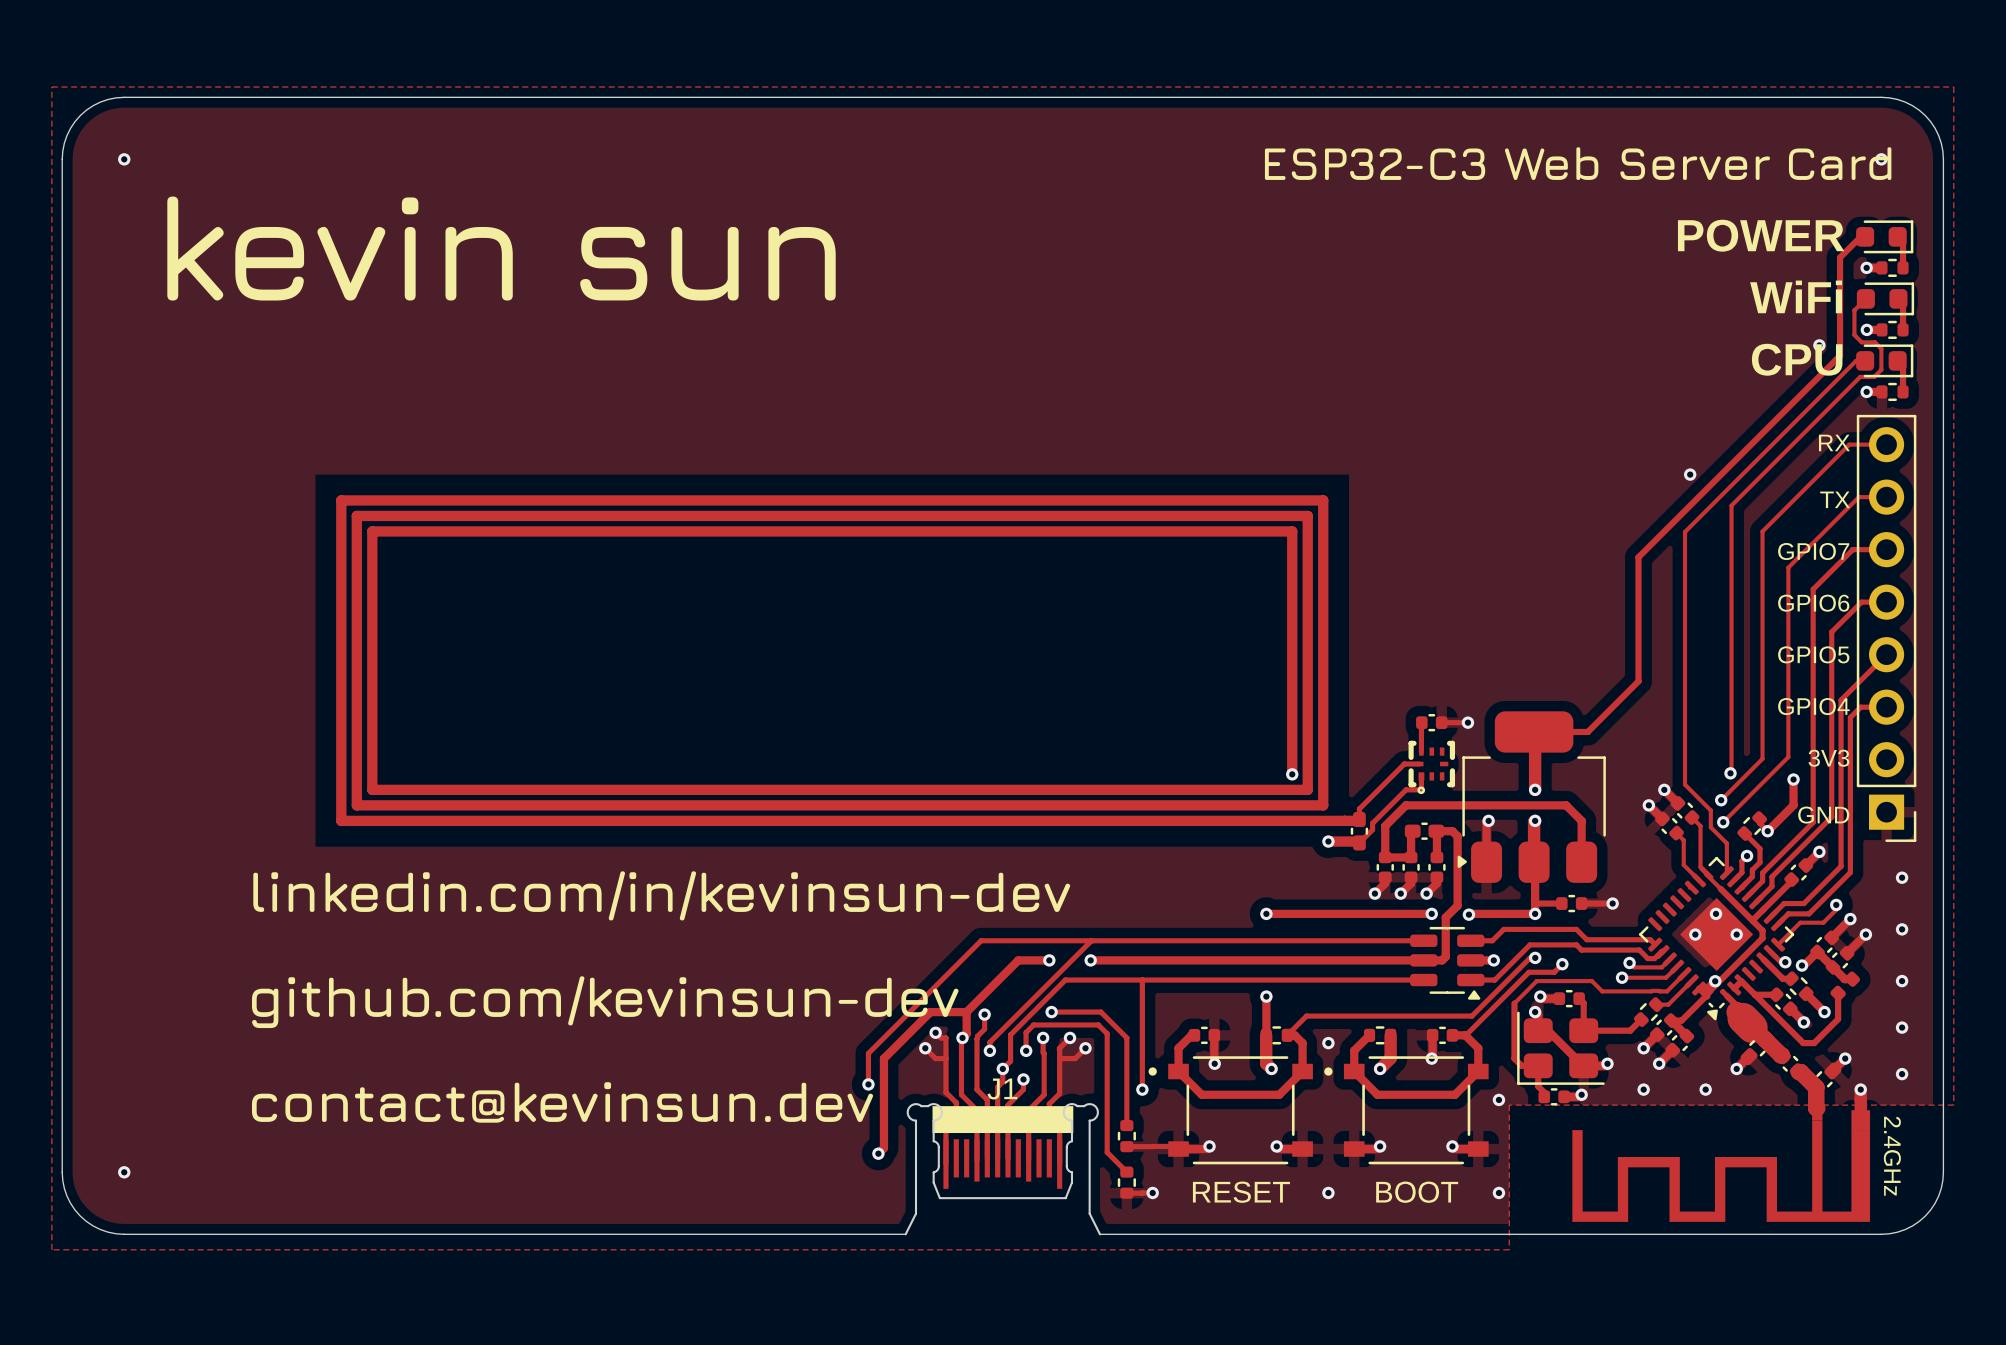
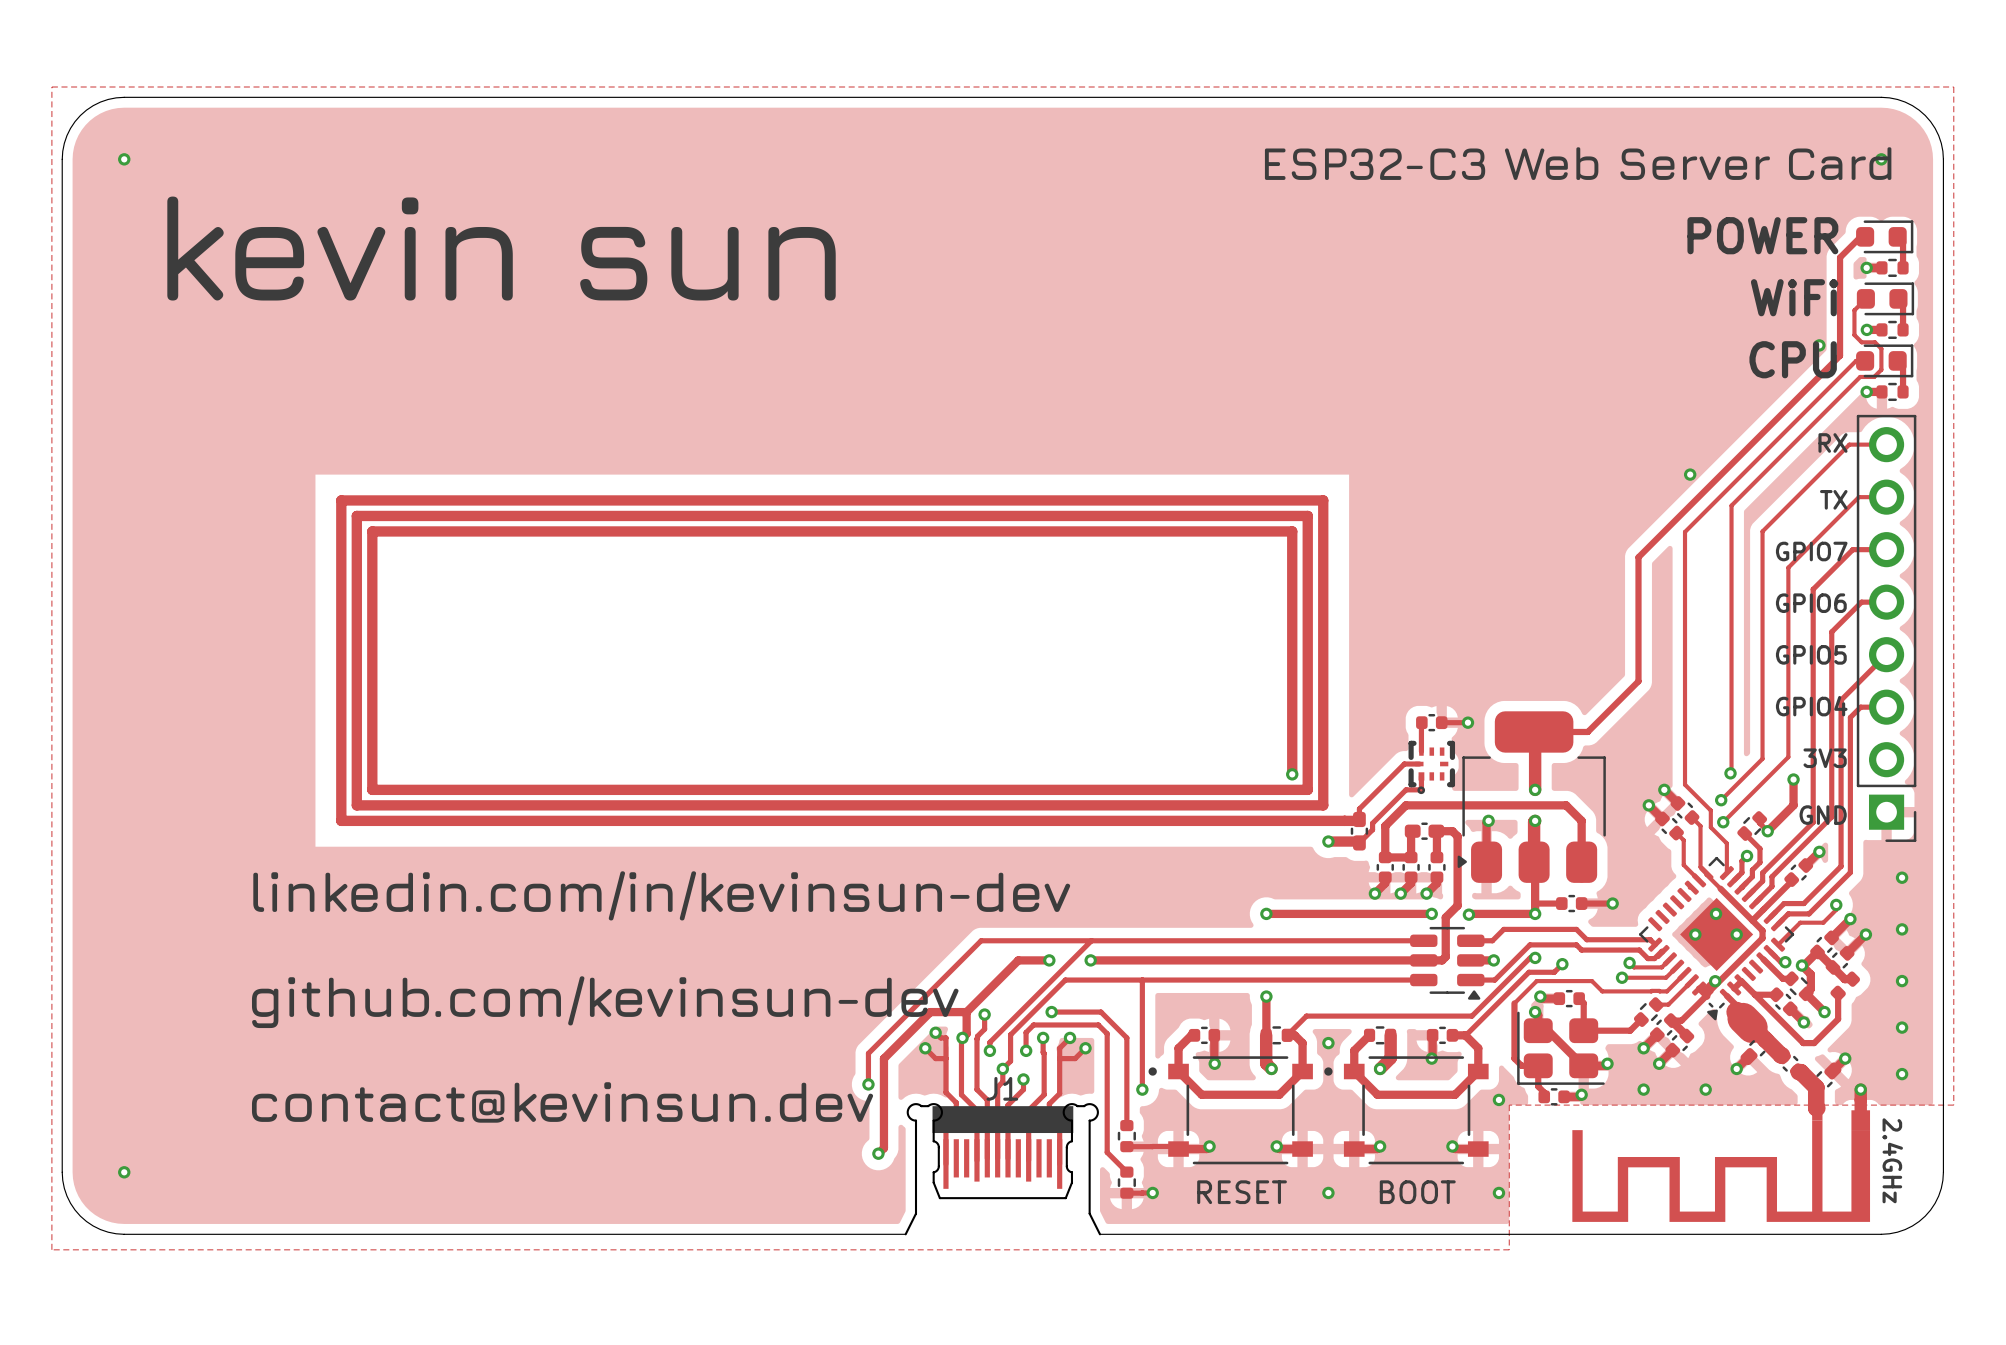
track: none -> (1801, 965) (1810, 974) (1810, 989) (1806, 993)

